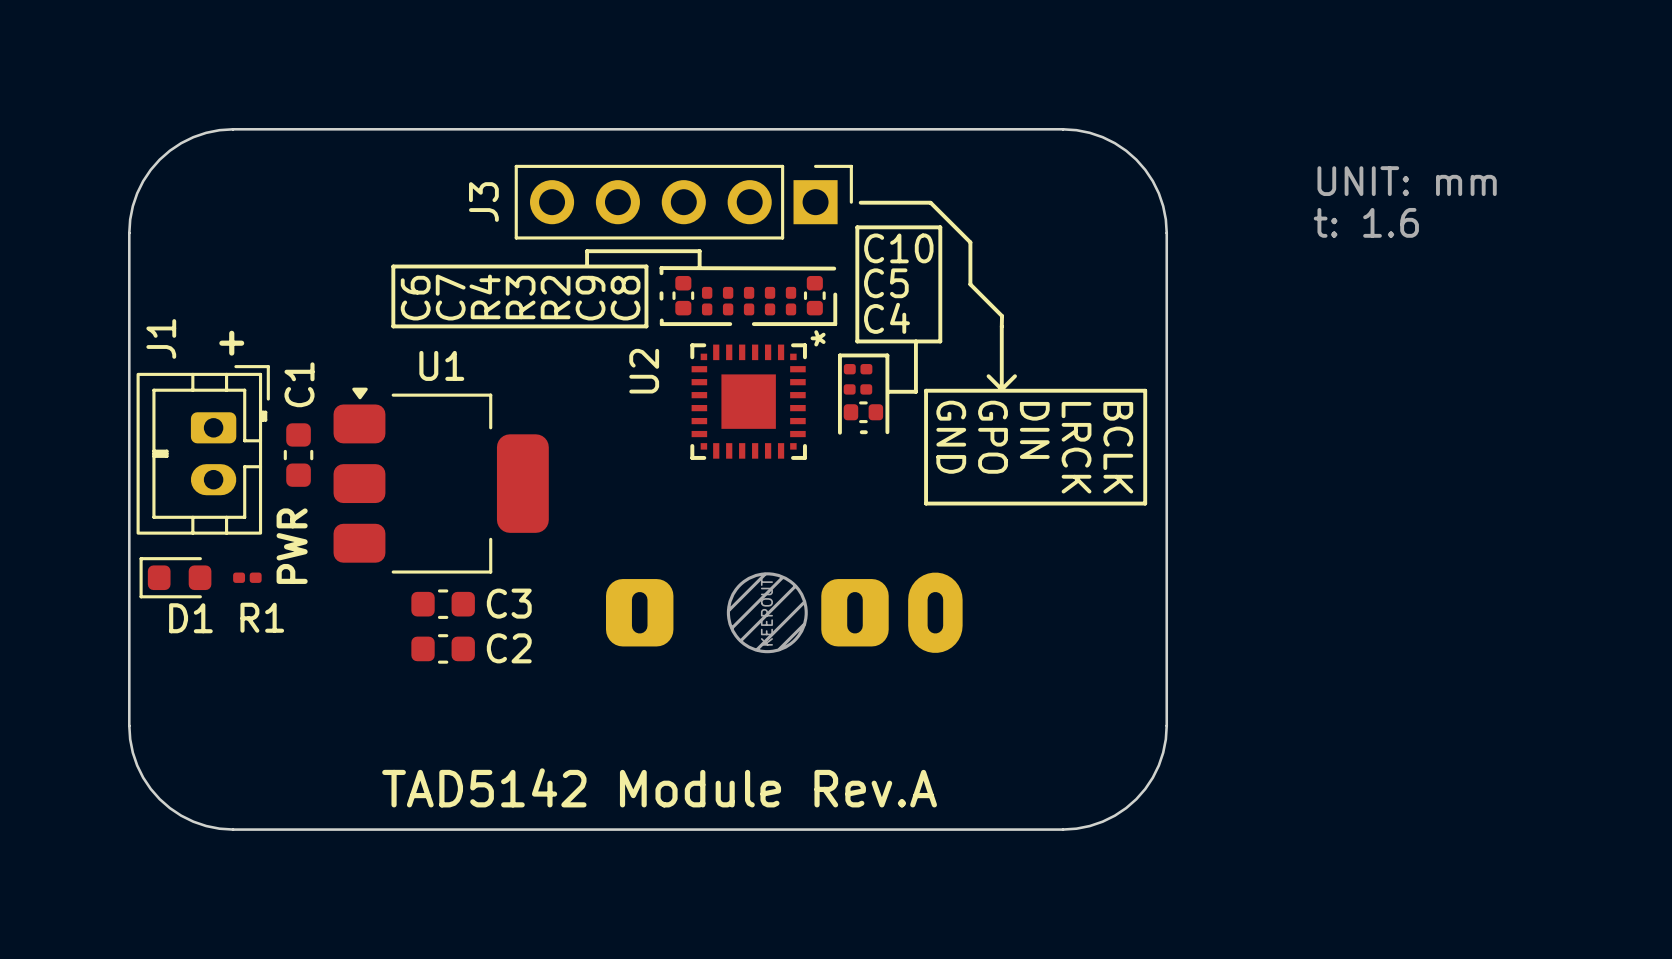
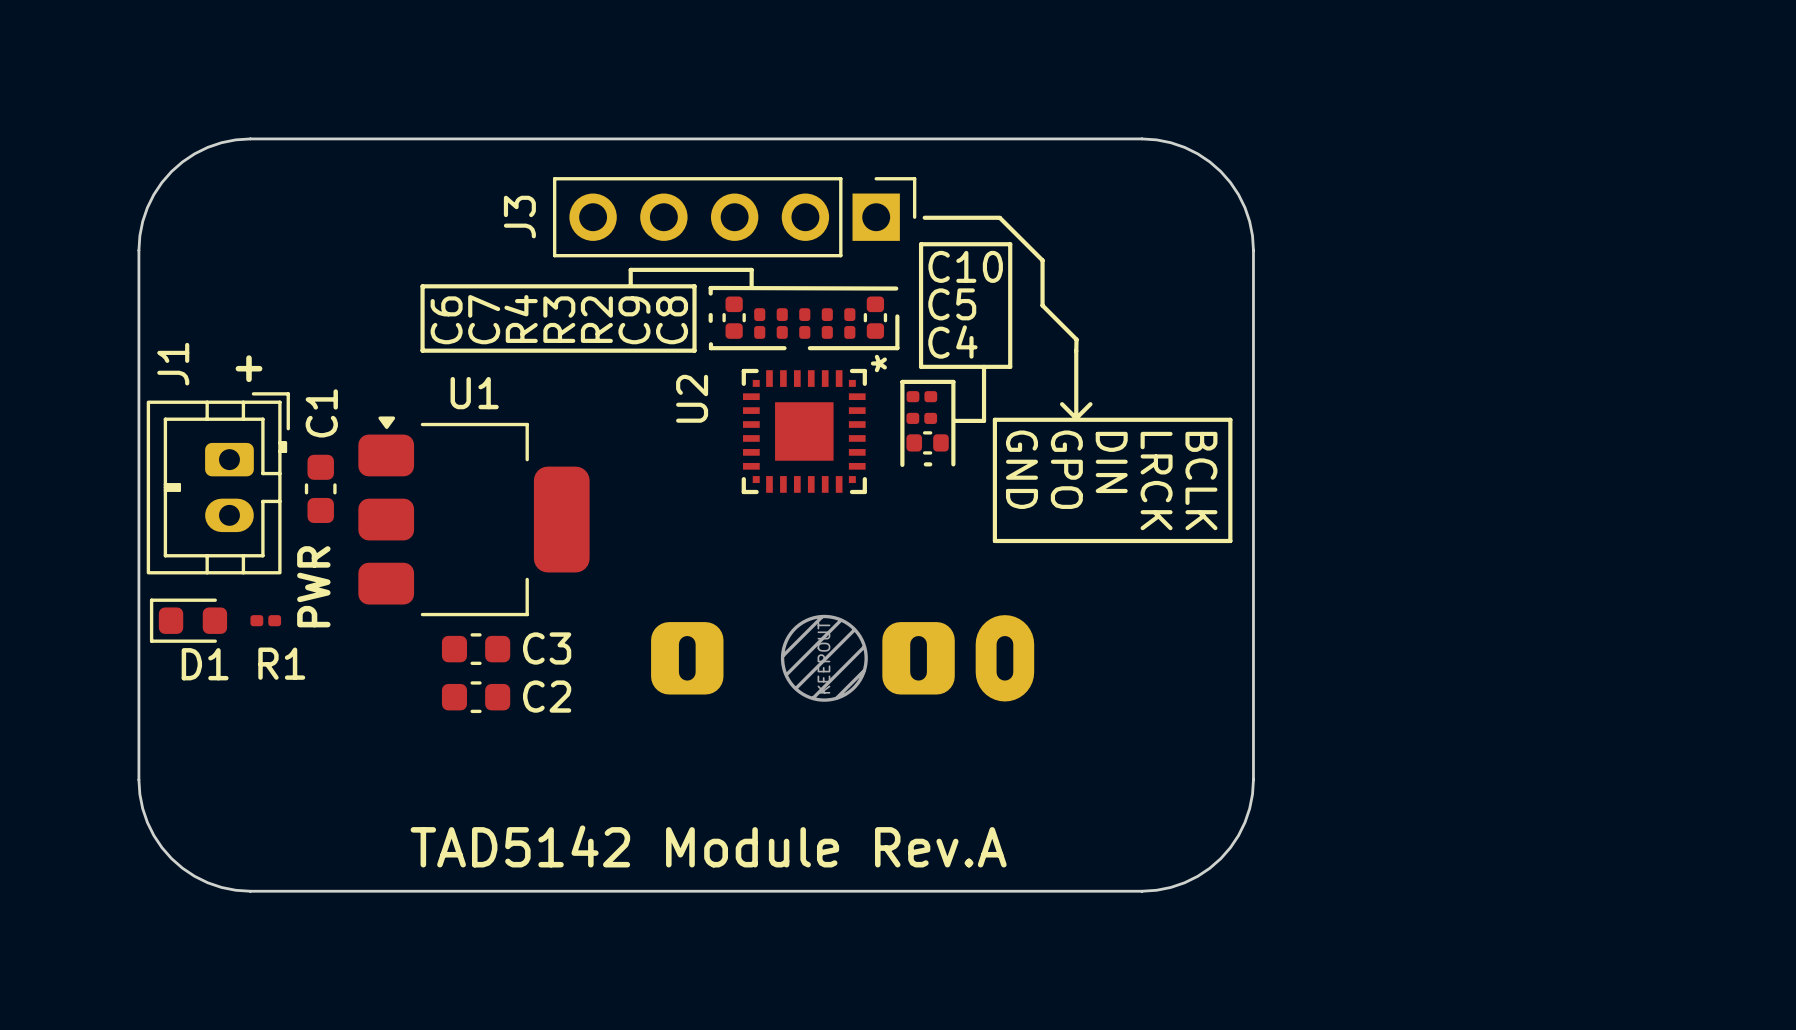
text: UNIT: mm (1407, 181) -> none
text: t: 1.6 (1366, 222) -> none

